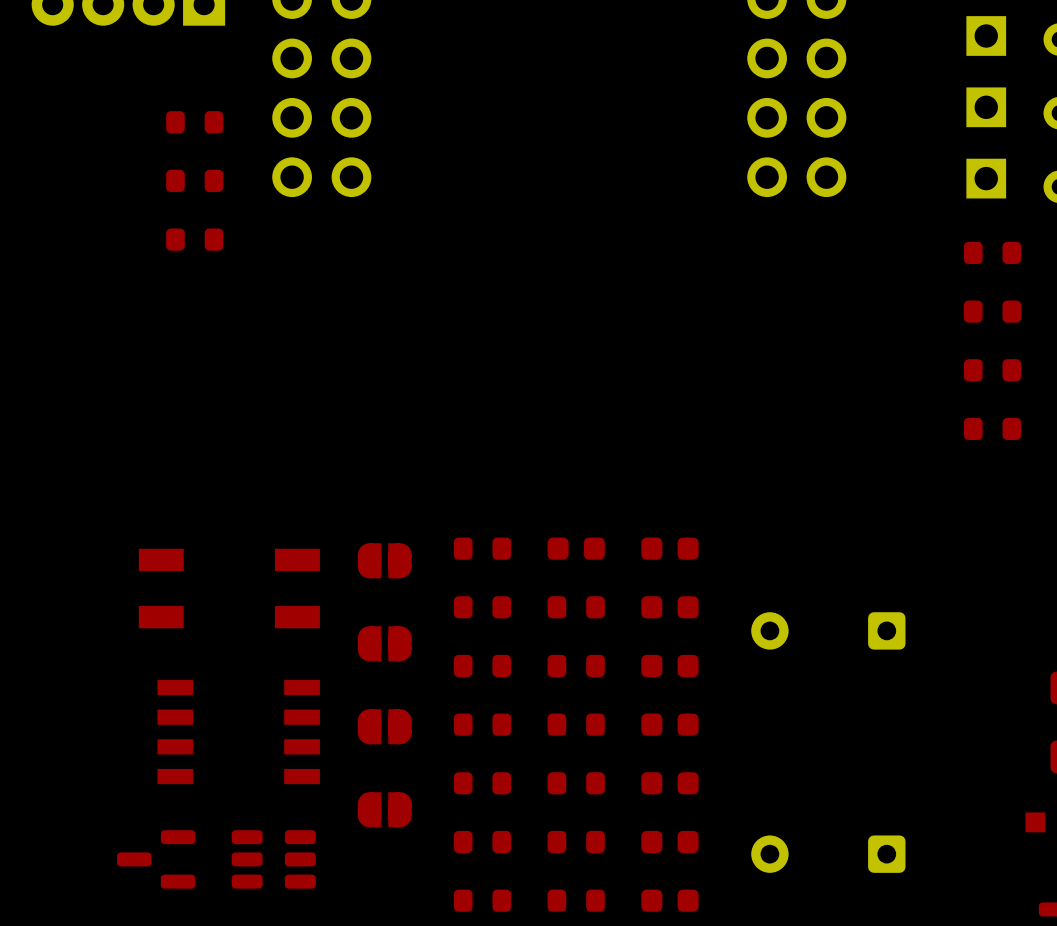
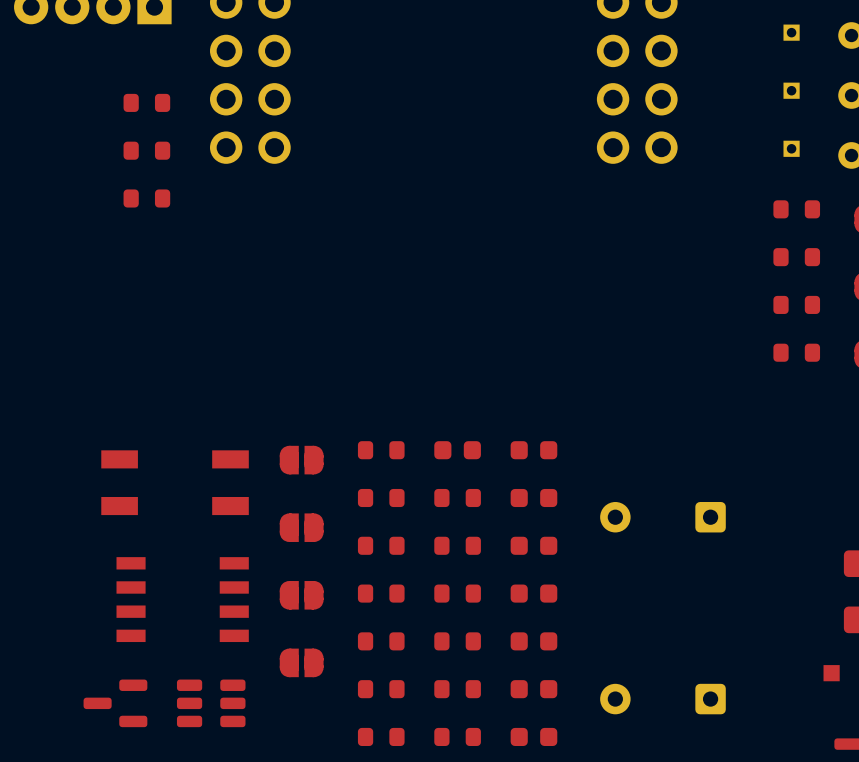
part footprint: [966, 16, 1007, 56] -> [783, 24, 800, 41]
part footprint: [966, 87, 1007, 128] -> [783, 82, 800, 99]
part footprint: [966, 158, 1007, 199] -> [783, 140, 800, 157]

